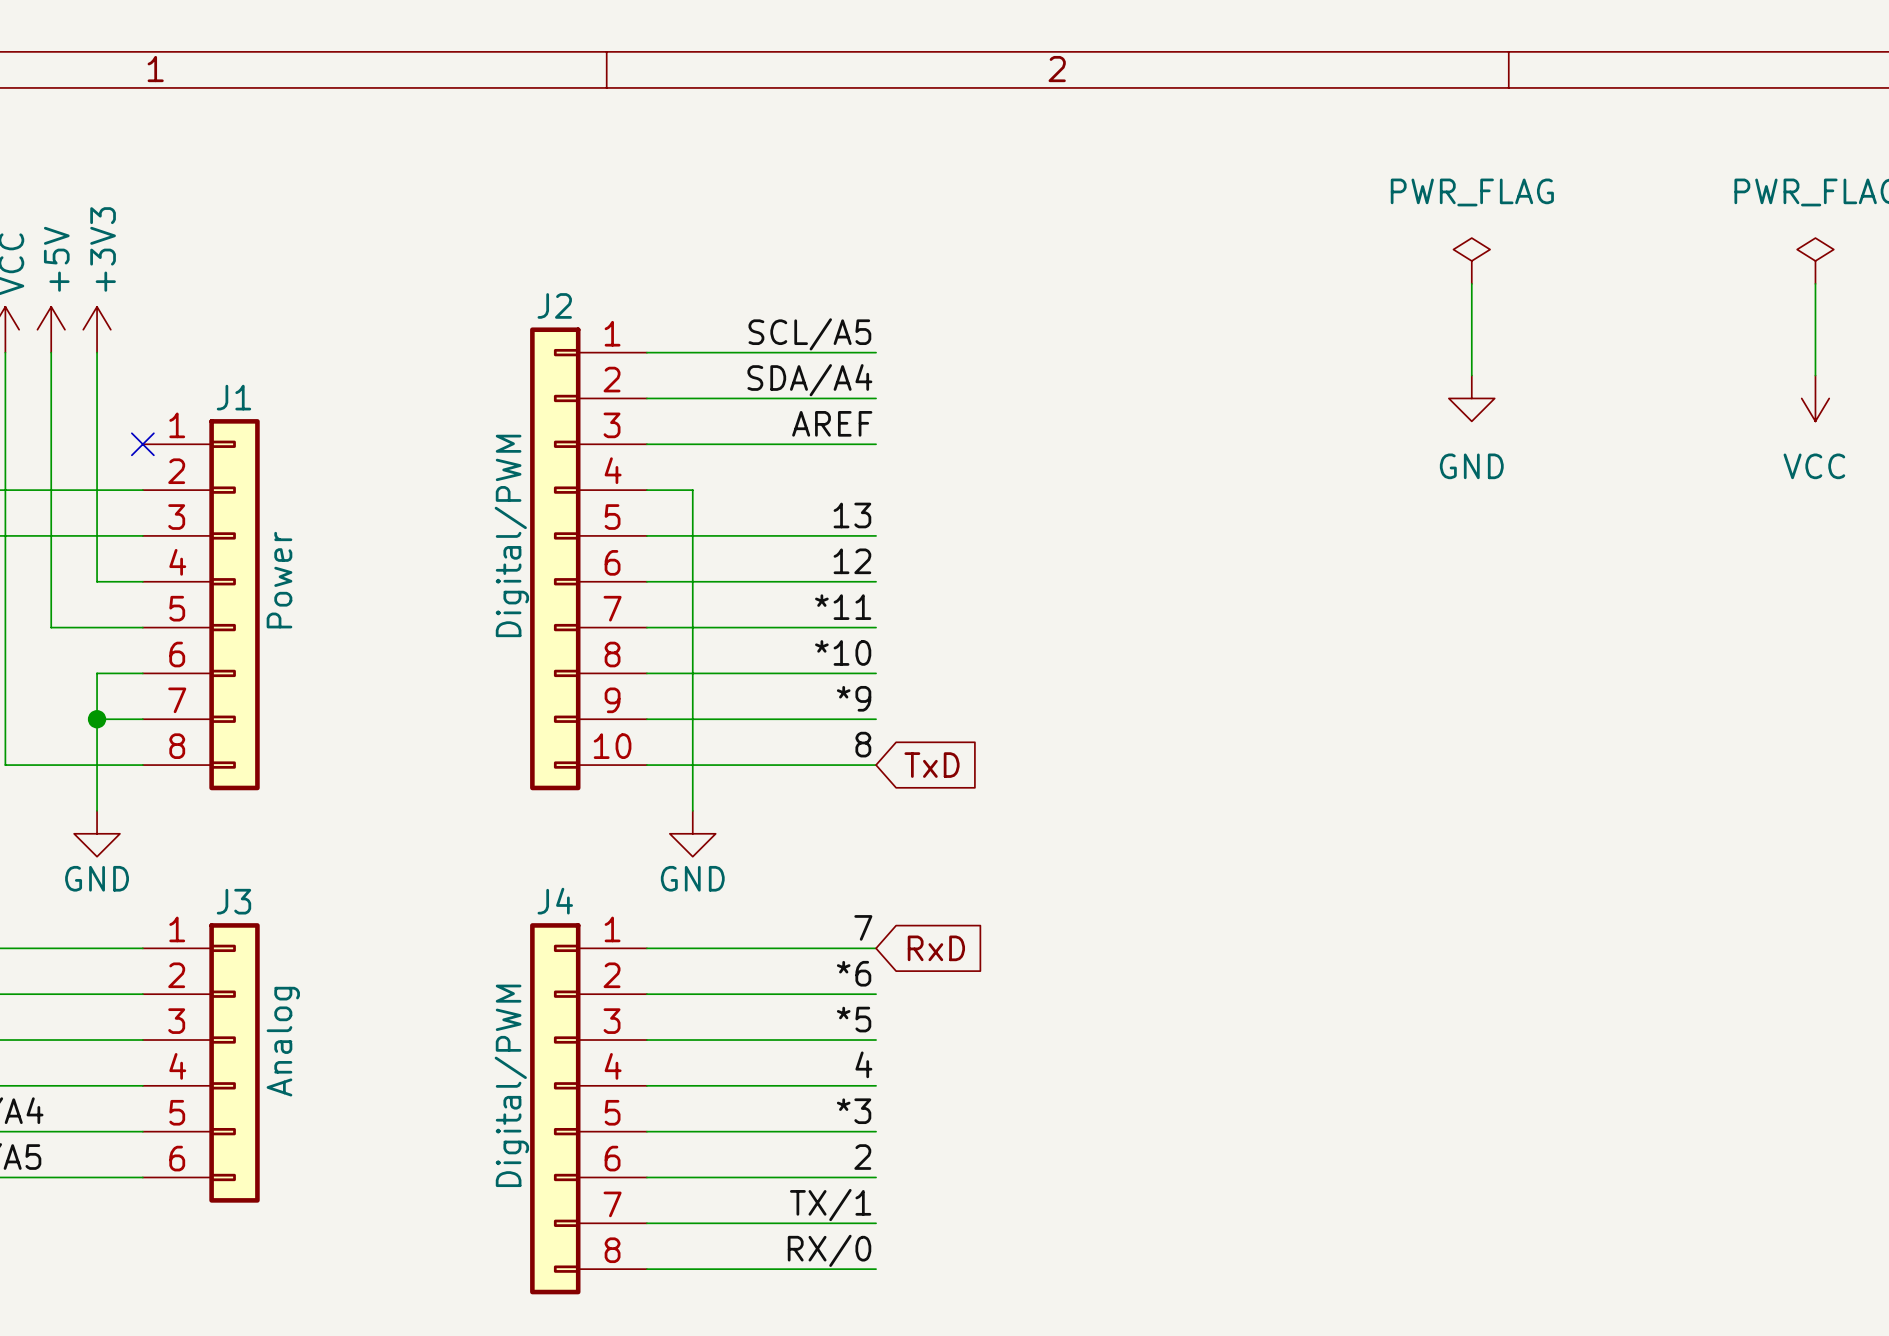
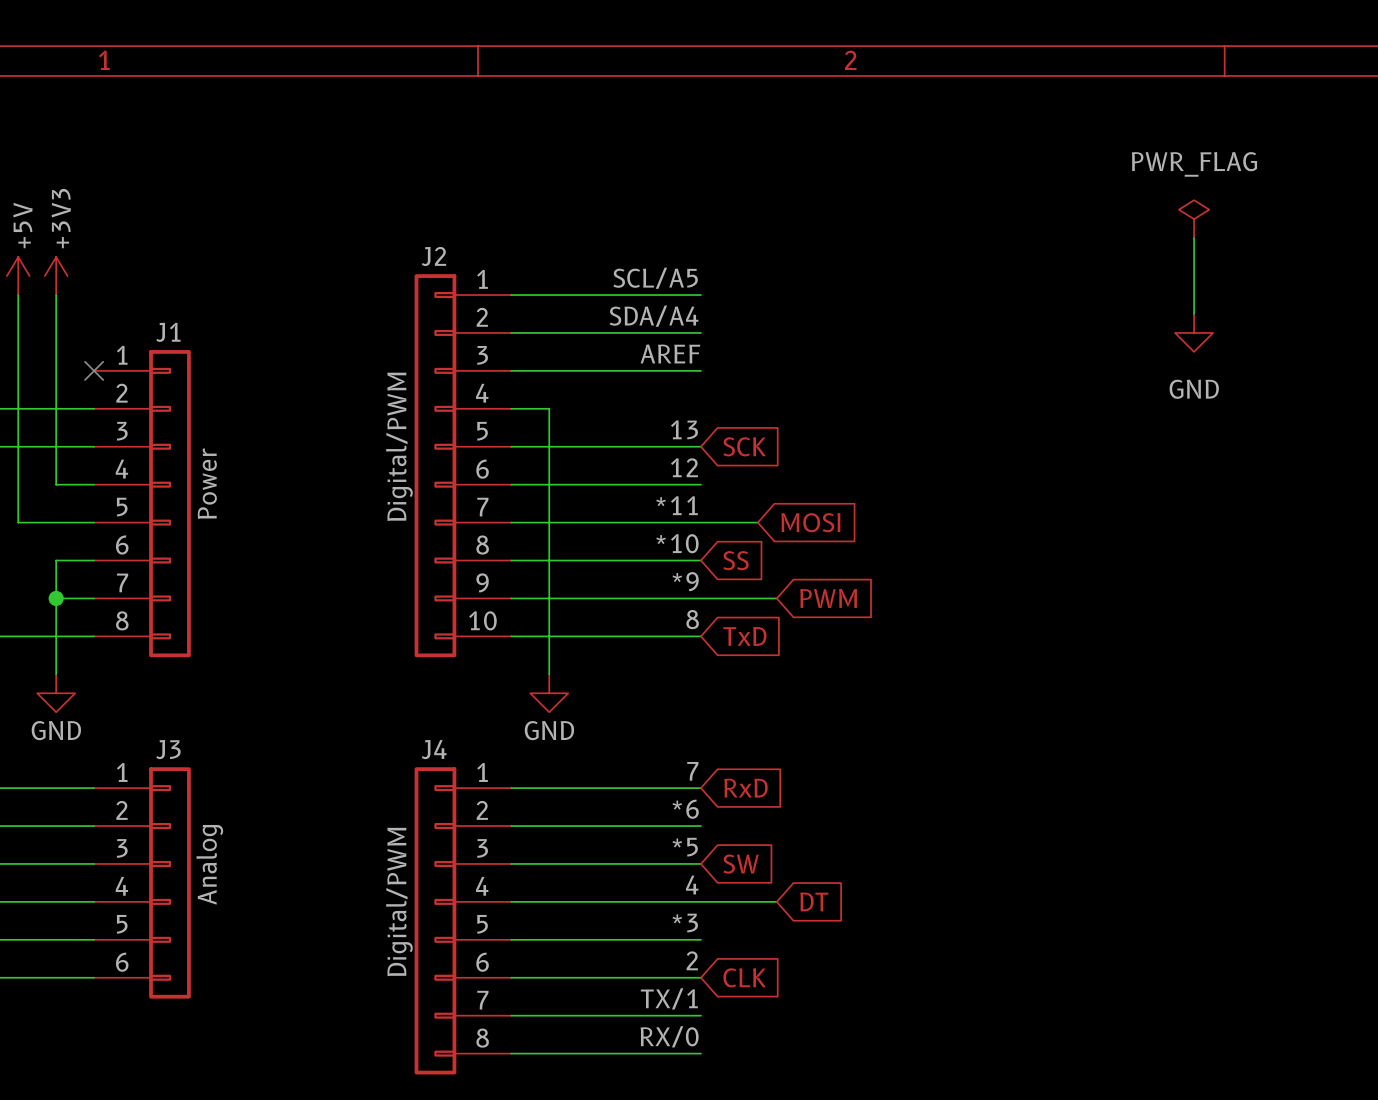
global label: none -> SCK (744, 446)
wire: none -> (700, 522) (757, 522)
global label: none -> MOSI (810, 522)
global label: none -> SS (735, 560)
wire: none -> (700, 598) (776, 598)
global label: none -> PWM (828, 598)
global label: none -> SW (741, 864)
wire: none -> (700, 901) (776, 901)
global label: none -> DT (814, 901)
global label: none -> CLK (744, 977)

